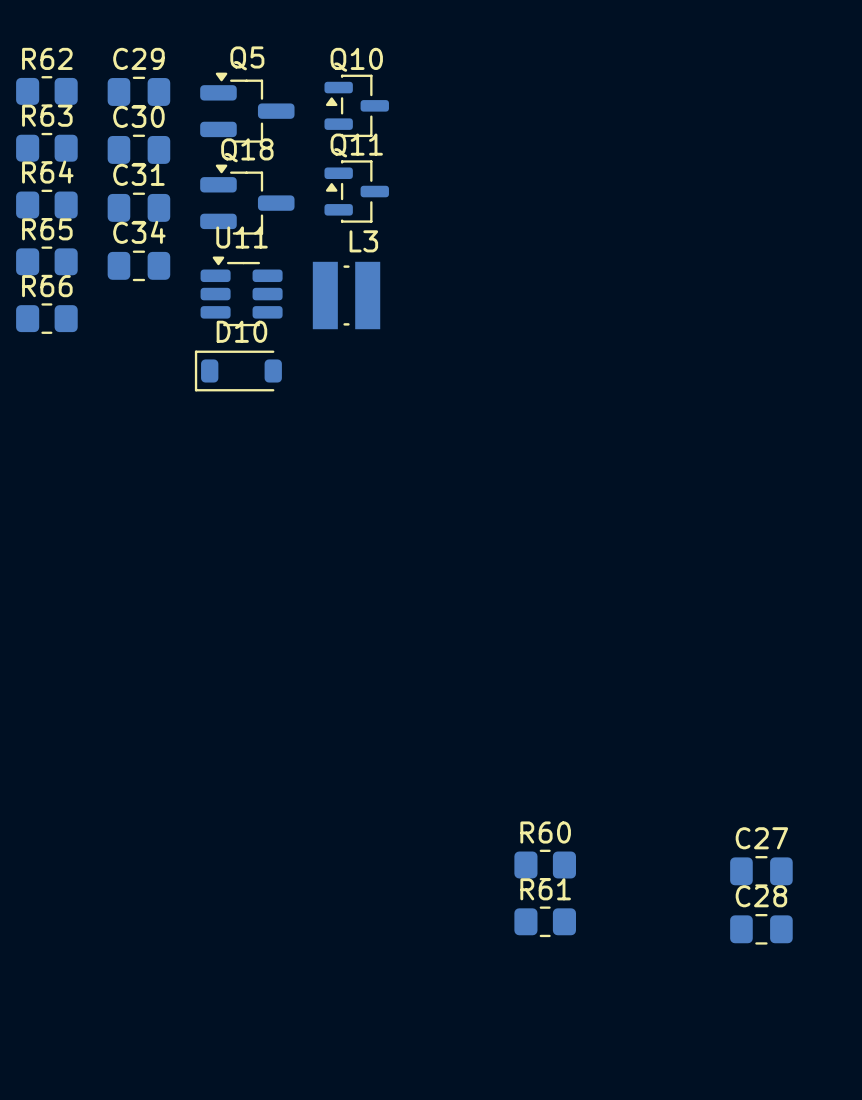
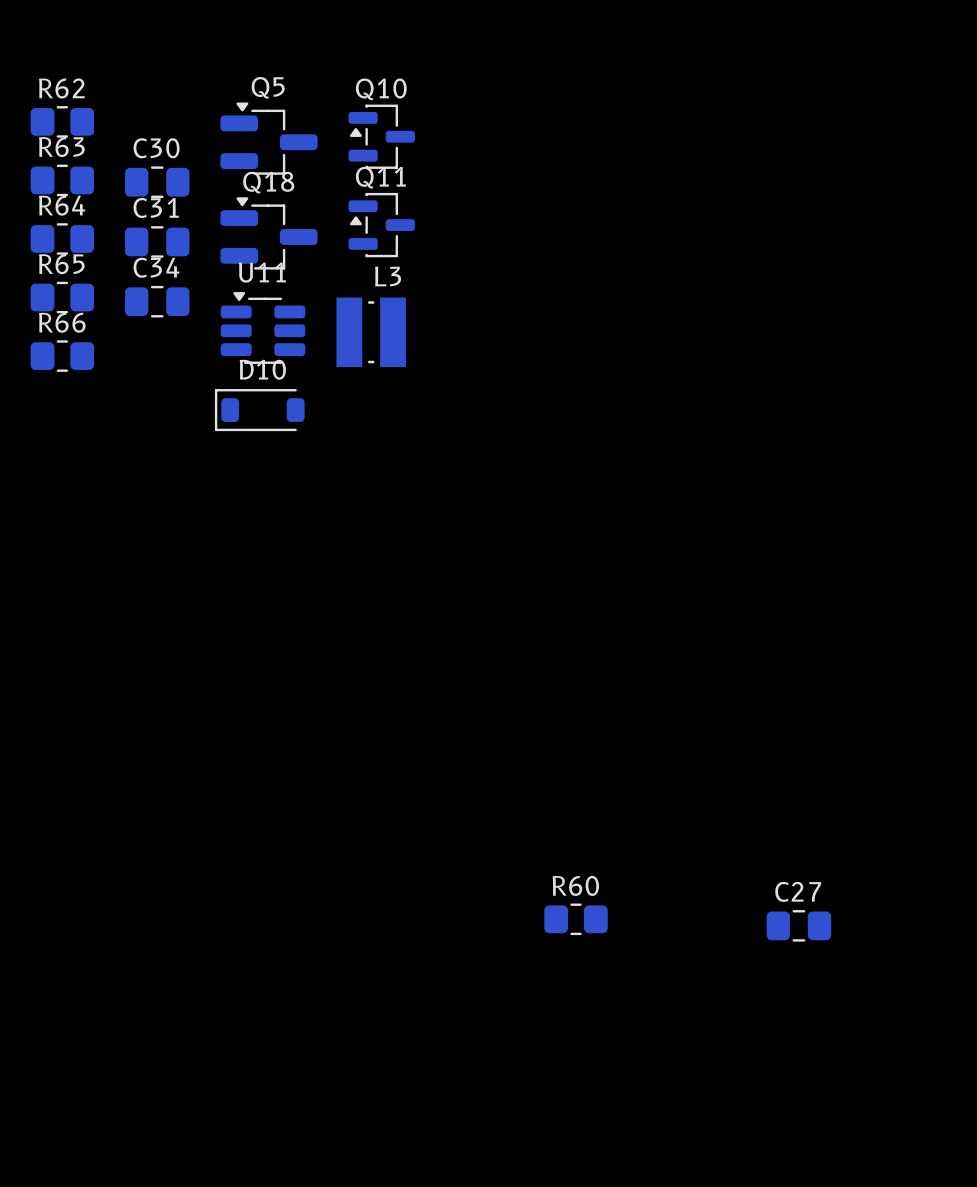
C29: (138, 91) -> none
R61: (545, 921) -> none
C28: (761, 929) -> none

